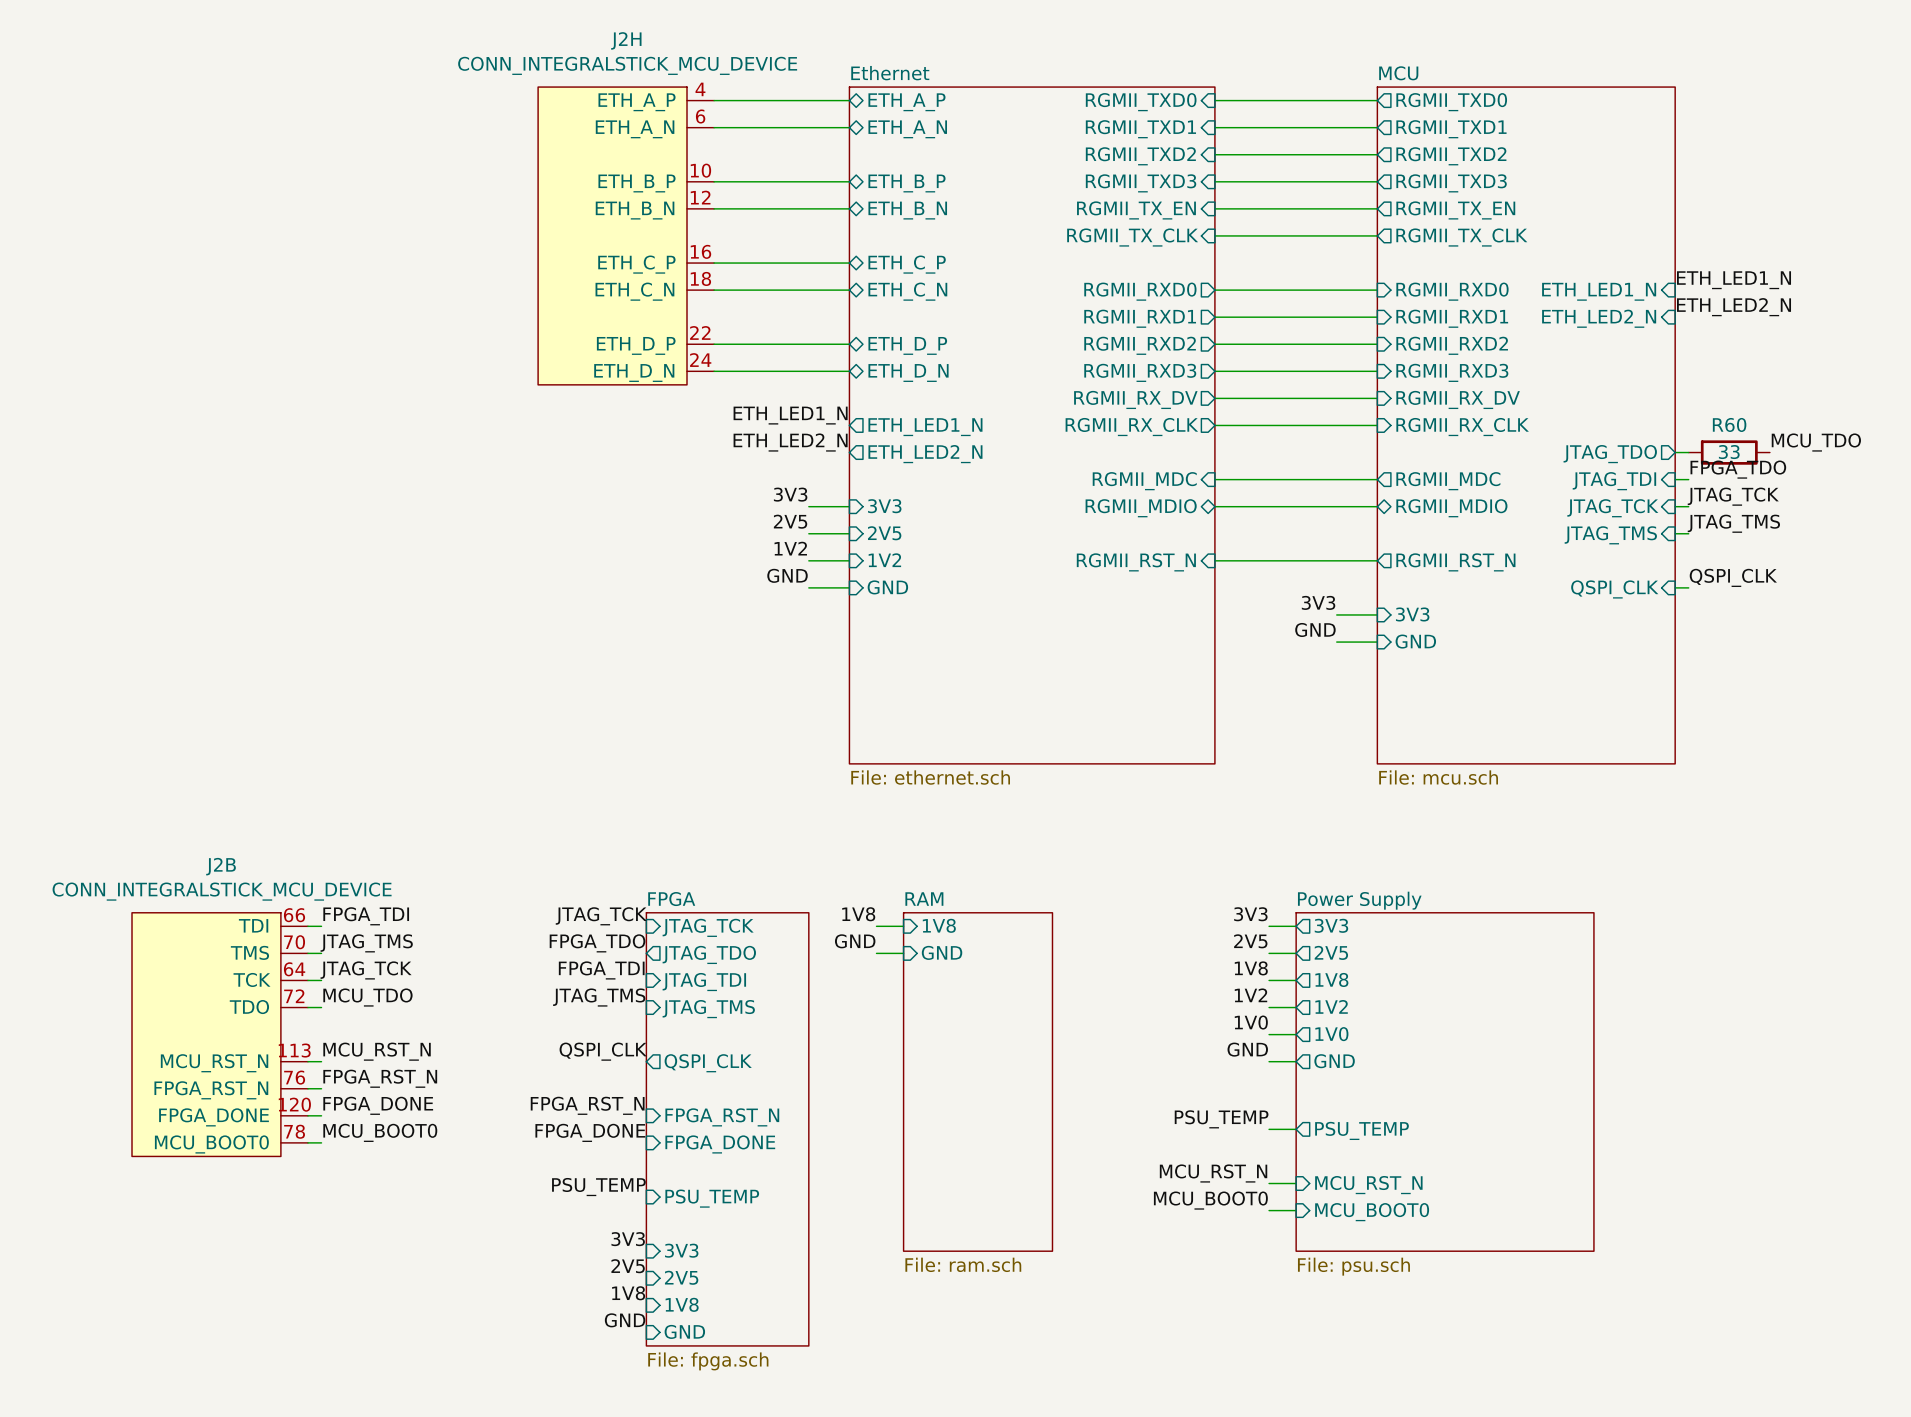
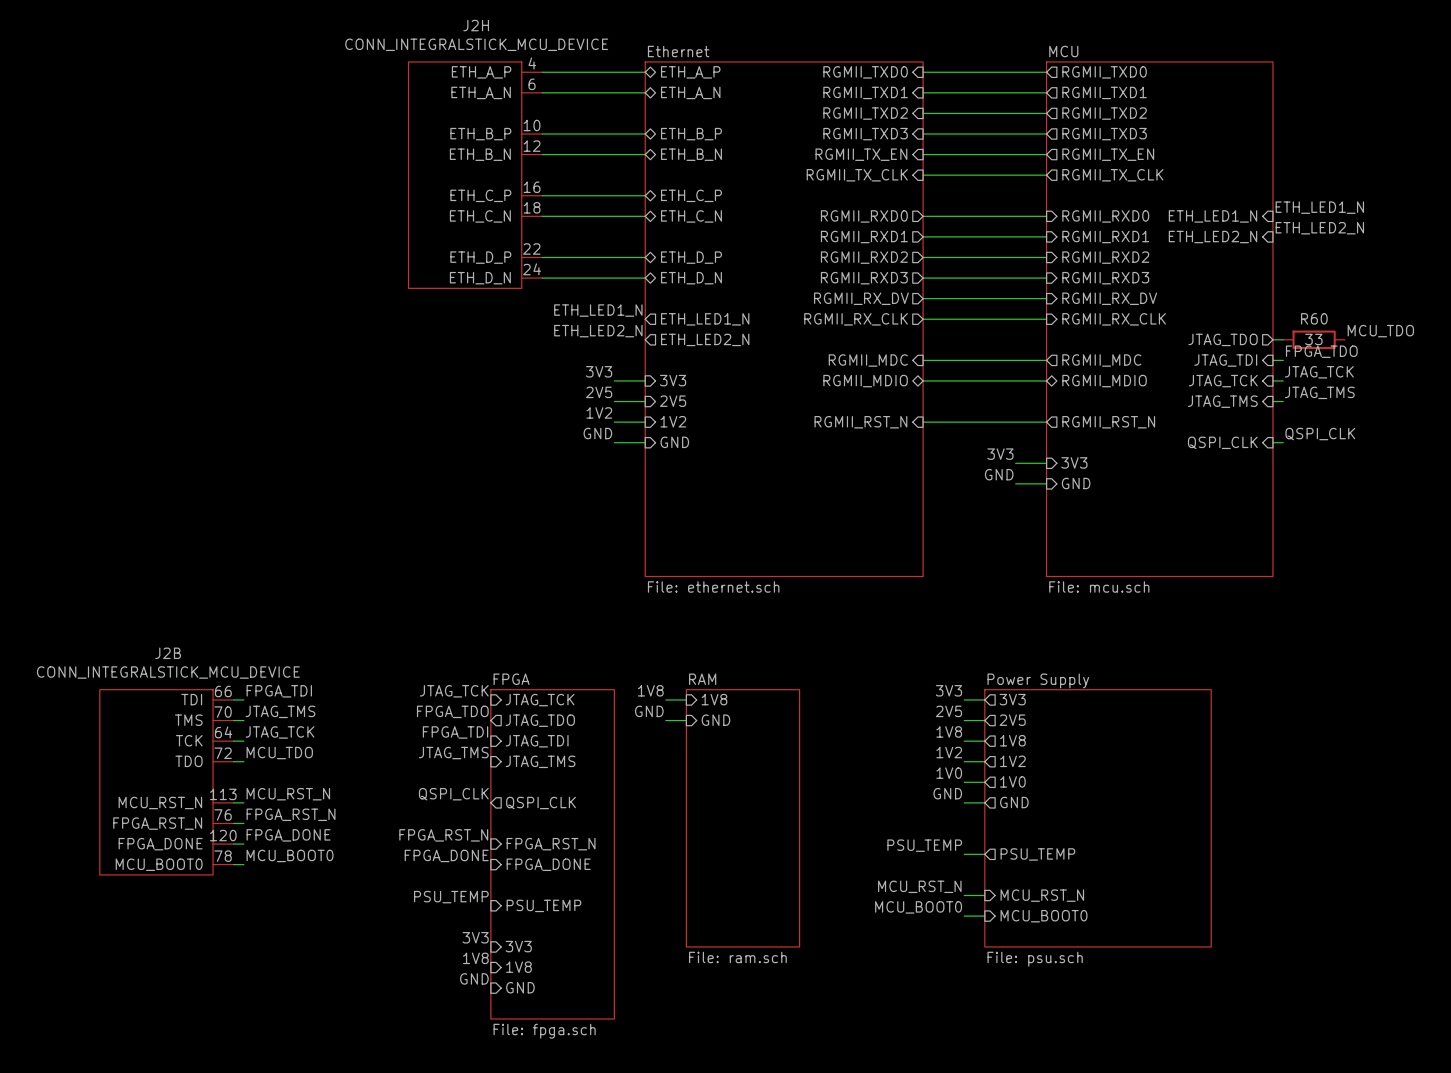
label: 2V5 (628, 1266) -> 1V8 (475, 958)
sheet pin: 2V5 (681, 1277) -> 1V8 (518, 967)
label: 1V8 (628, 1293) -> GND (474, 978)
sheet pin: 1V8 (682, 1304) -> GND (520, 987)
label: GND (625, 1320) -> none
sheet pin: GND (684, 1331) -> none

